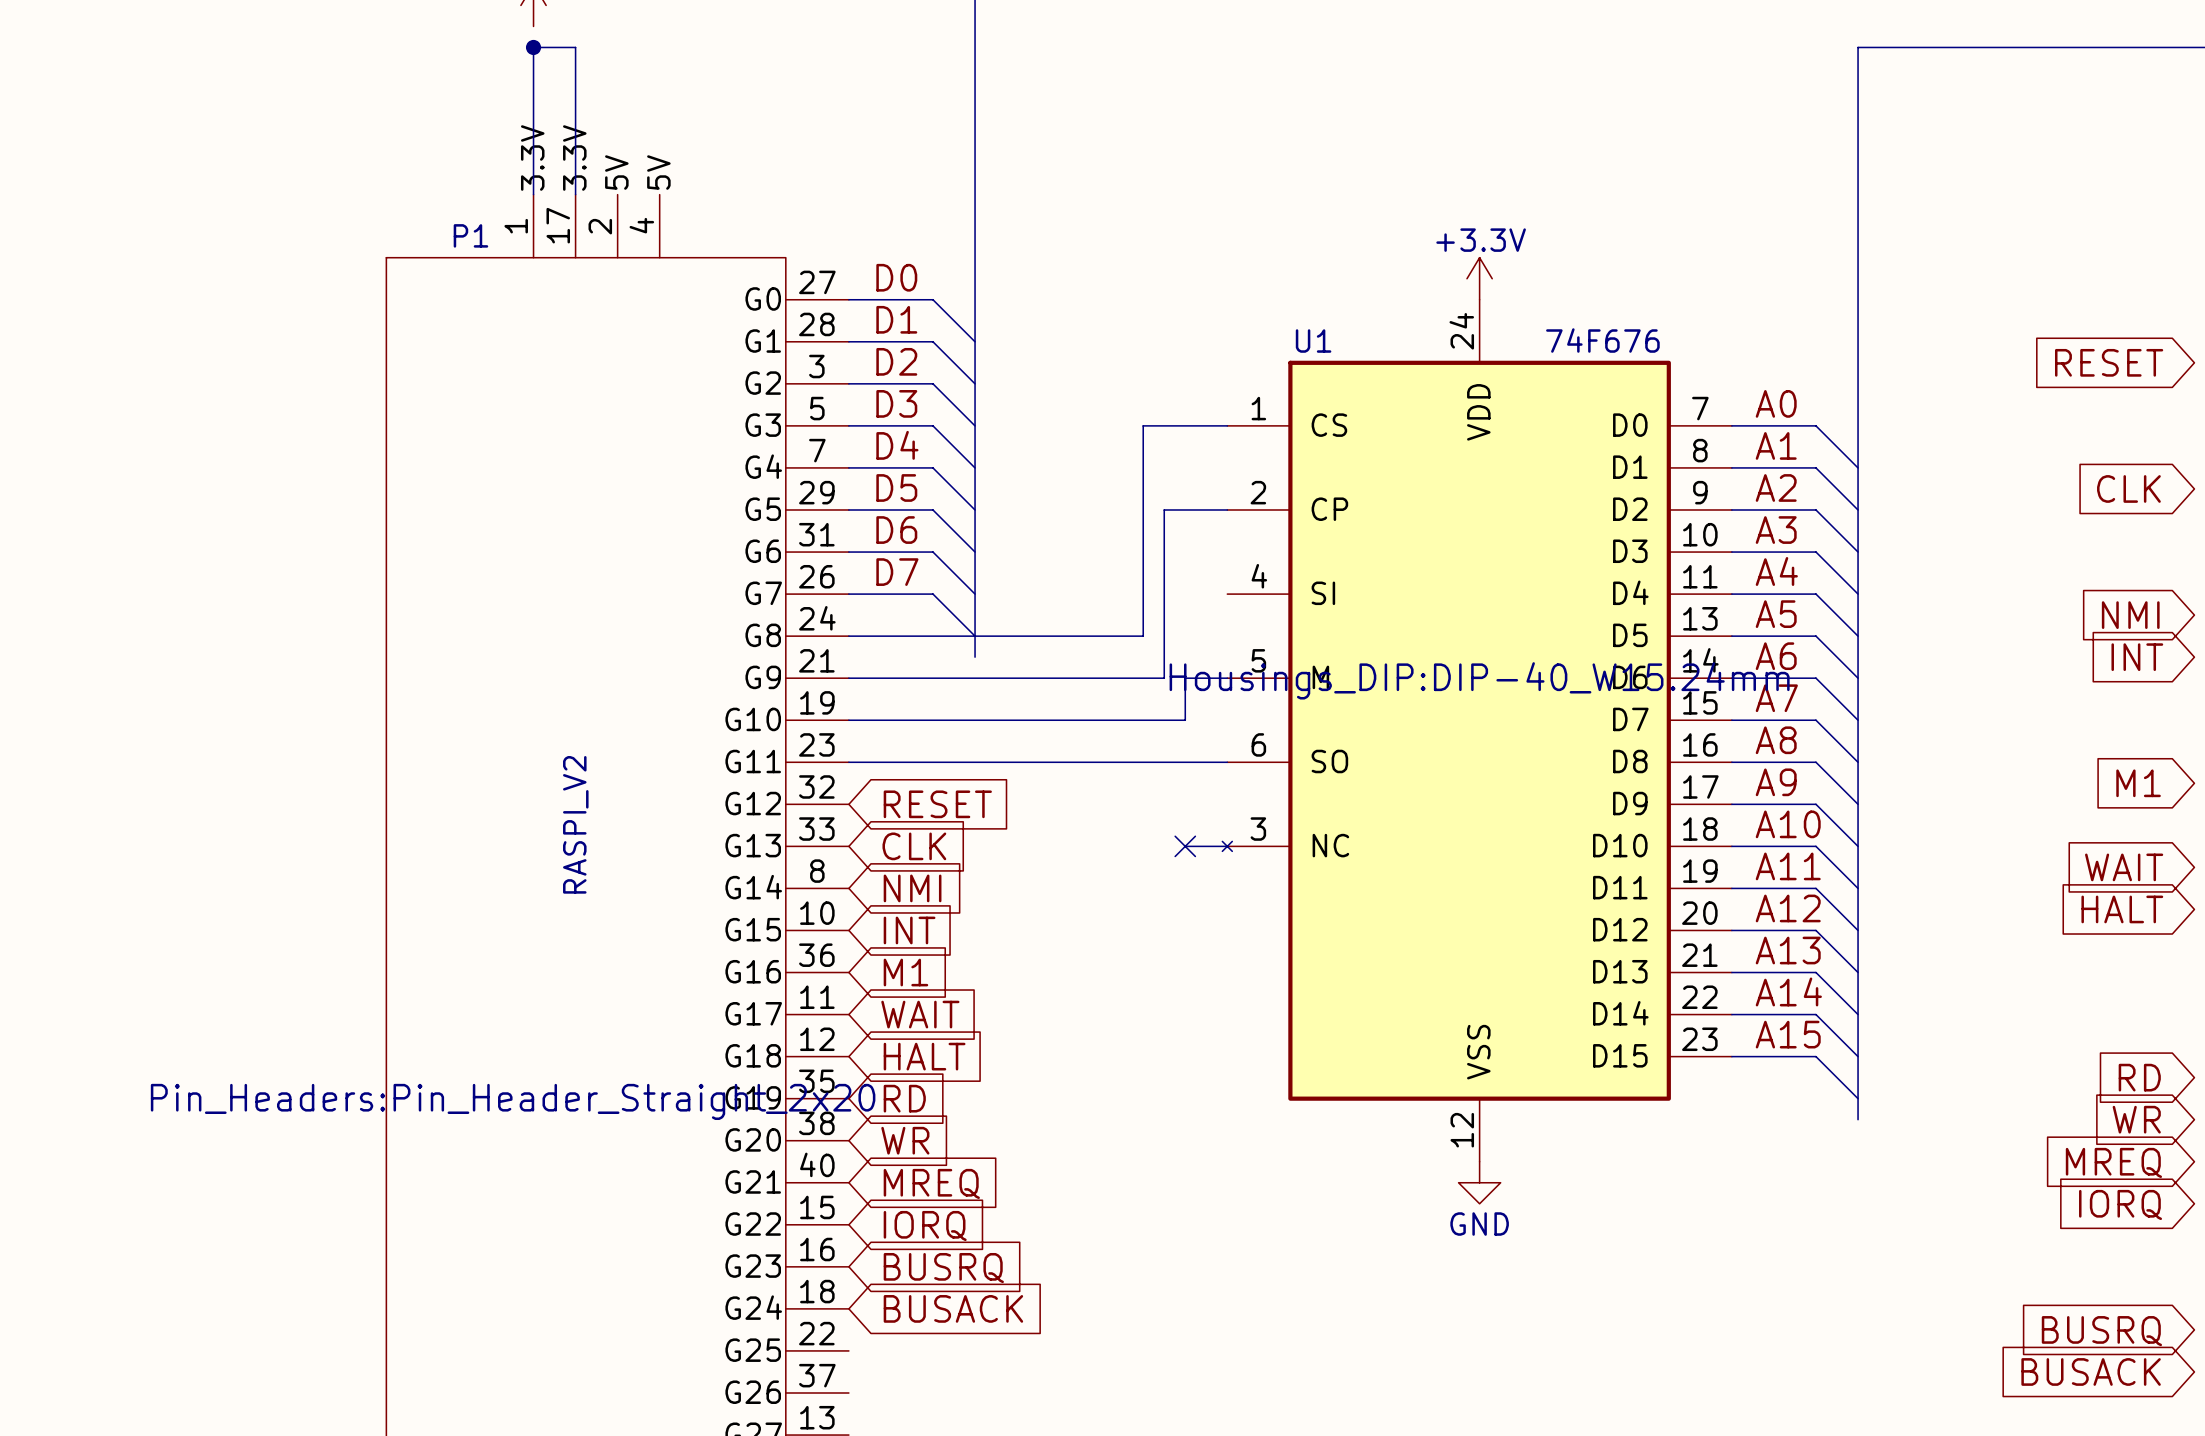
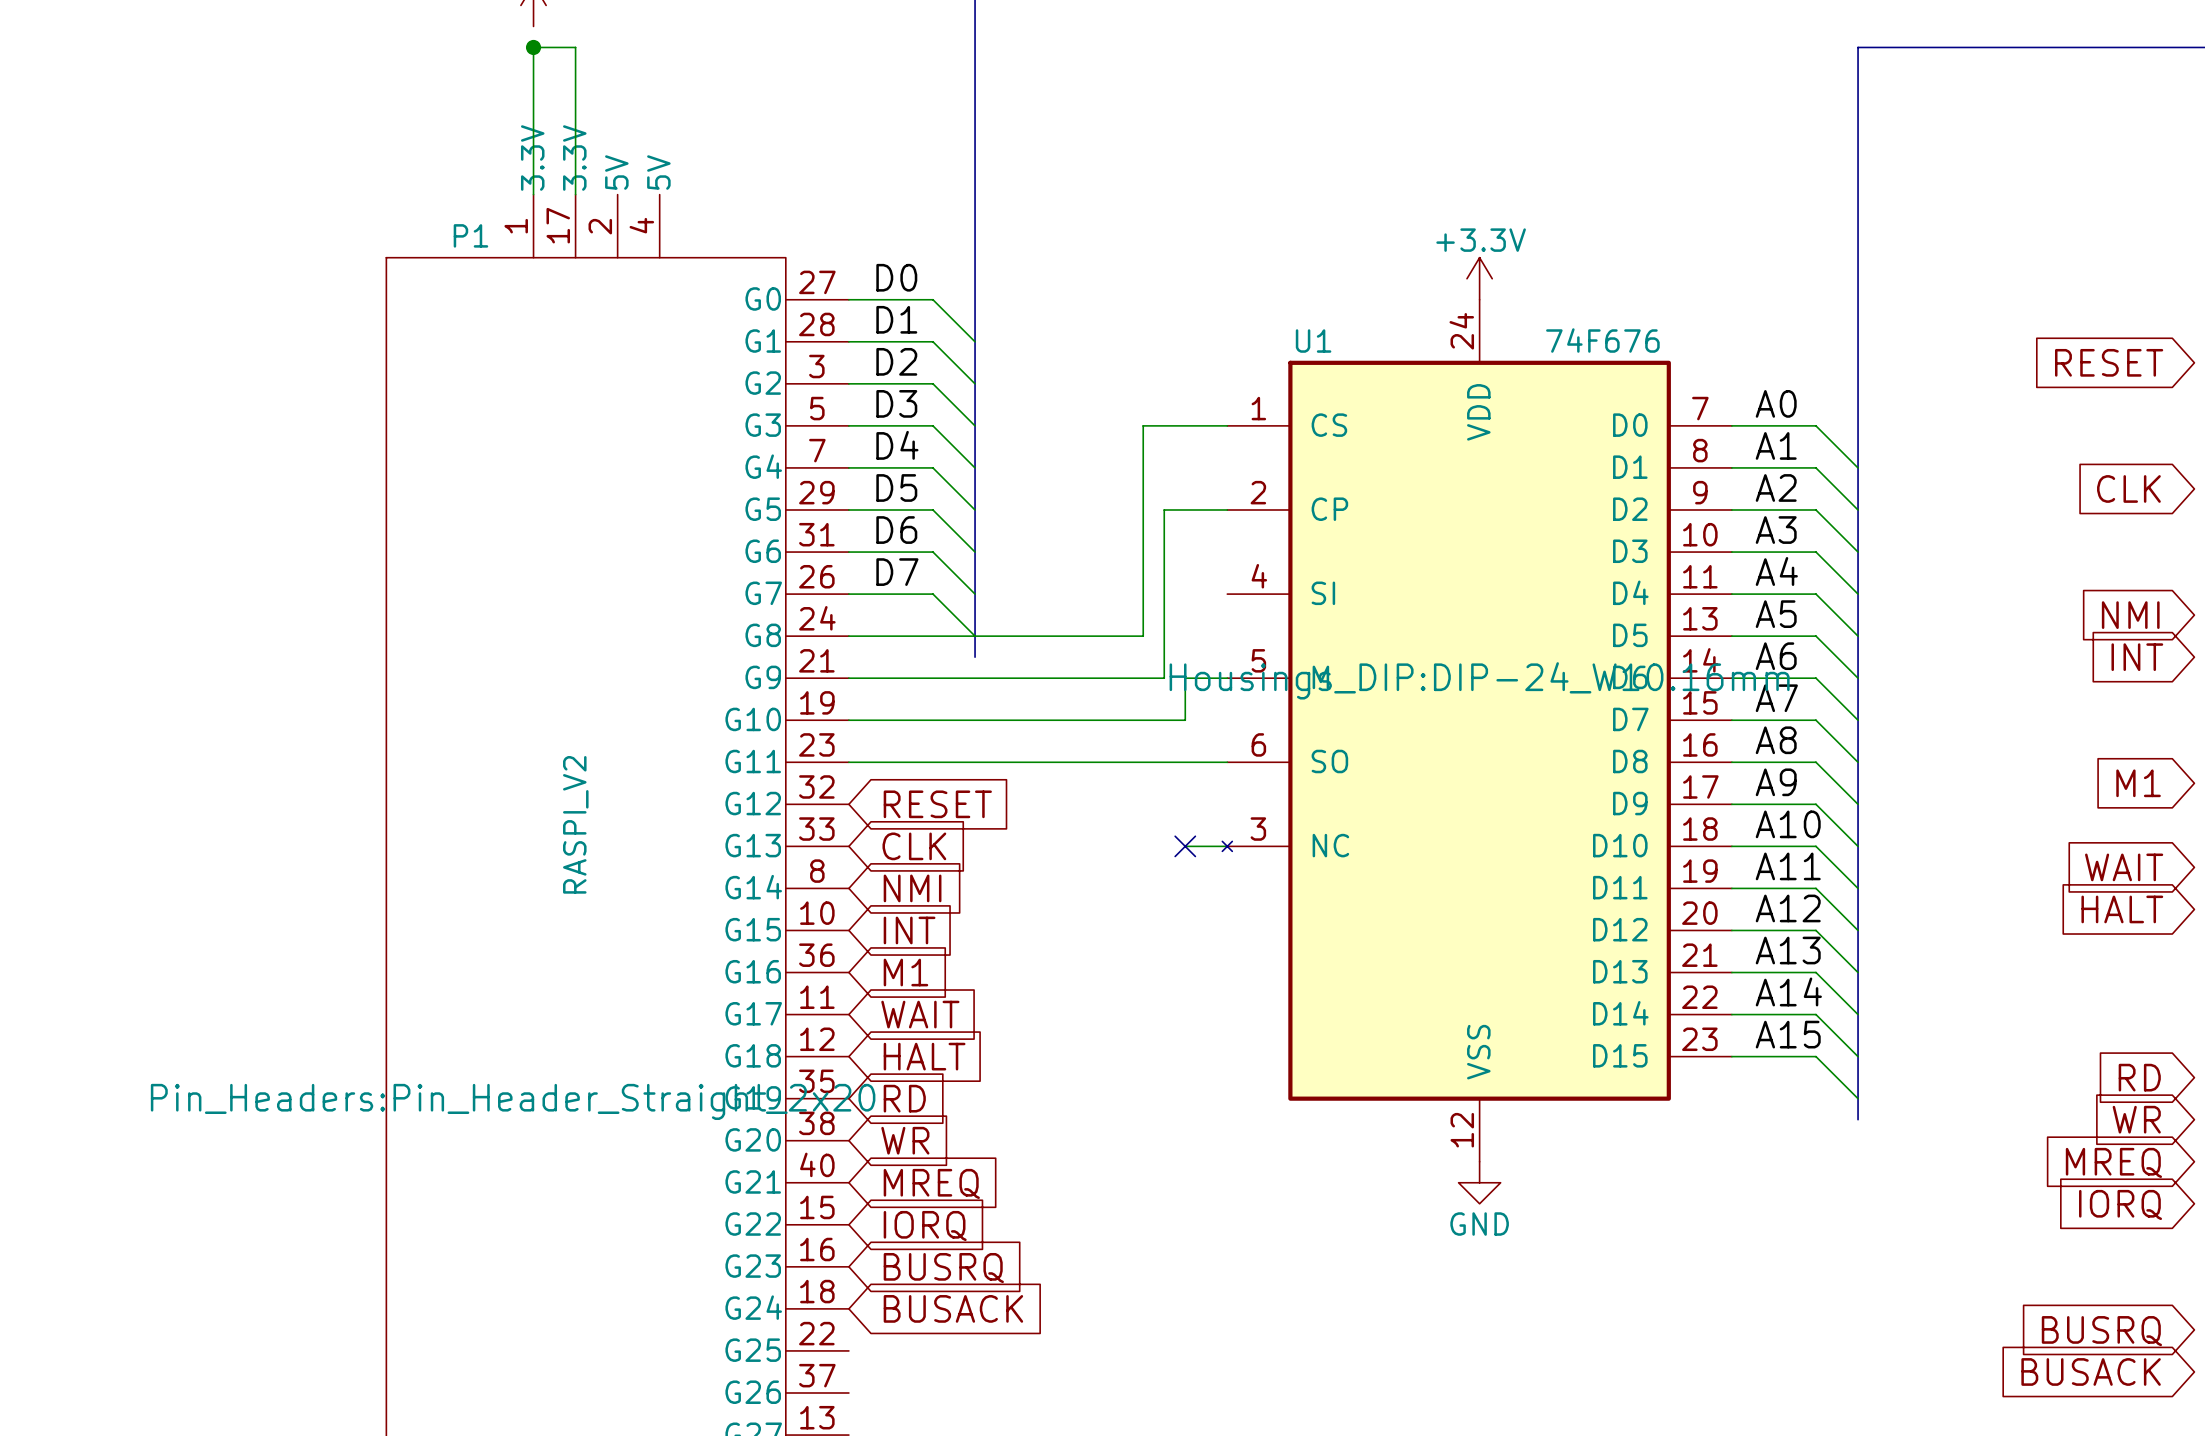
U1 text: Housings_DIP:DIP-40_W15.24mm (1479, 680) -> Housings_DIP:DIP-24_W10.16mm (1479, 680)

